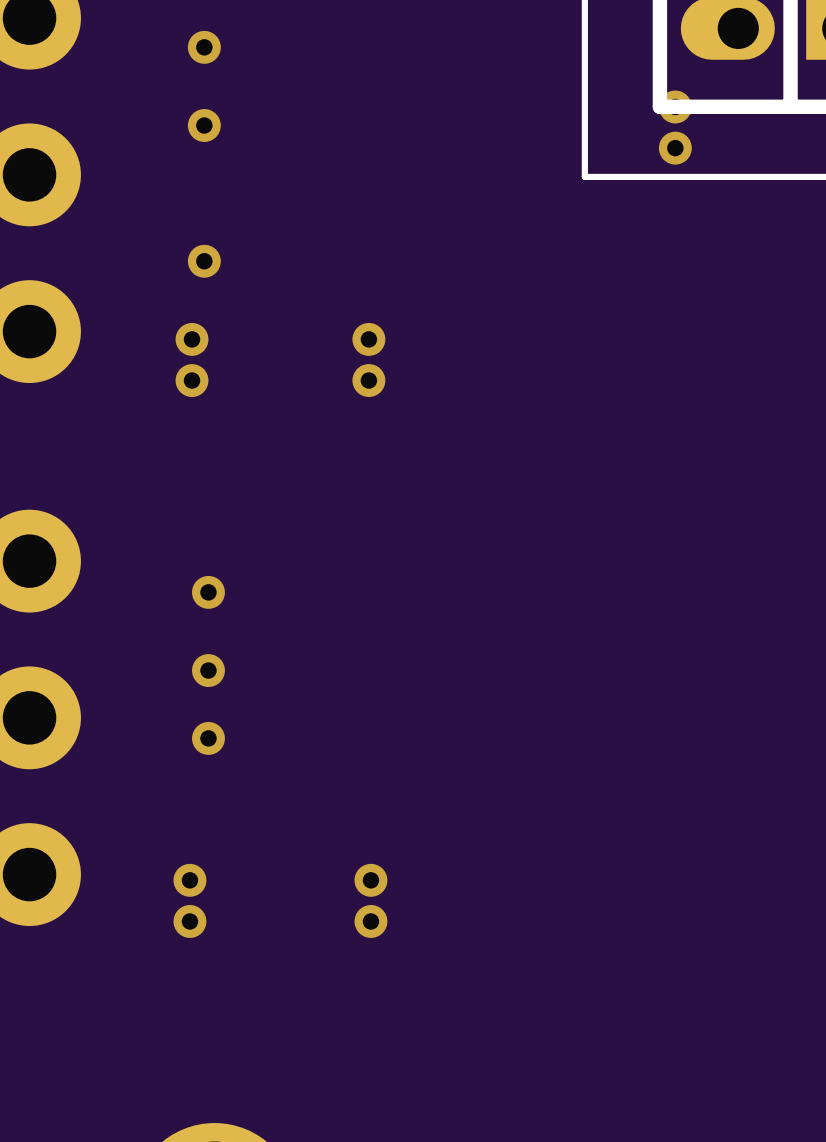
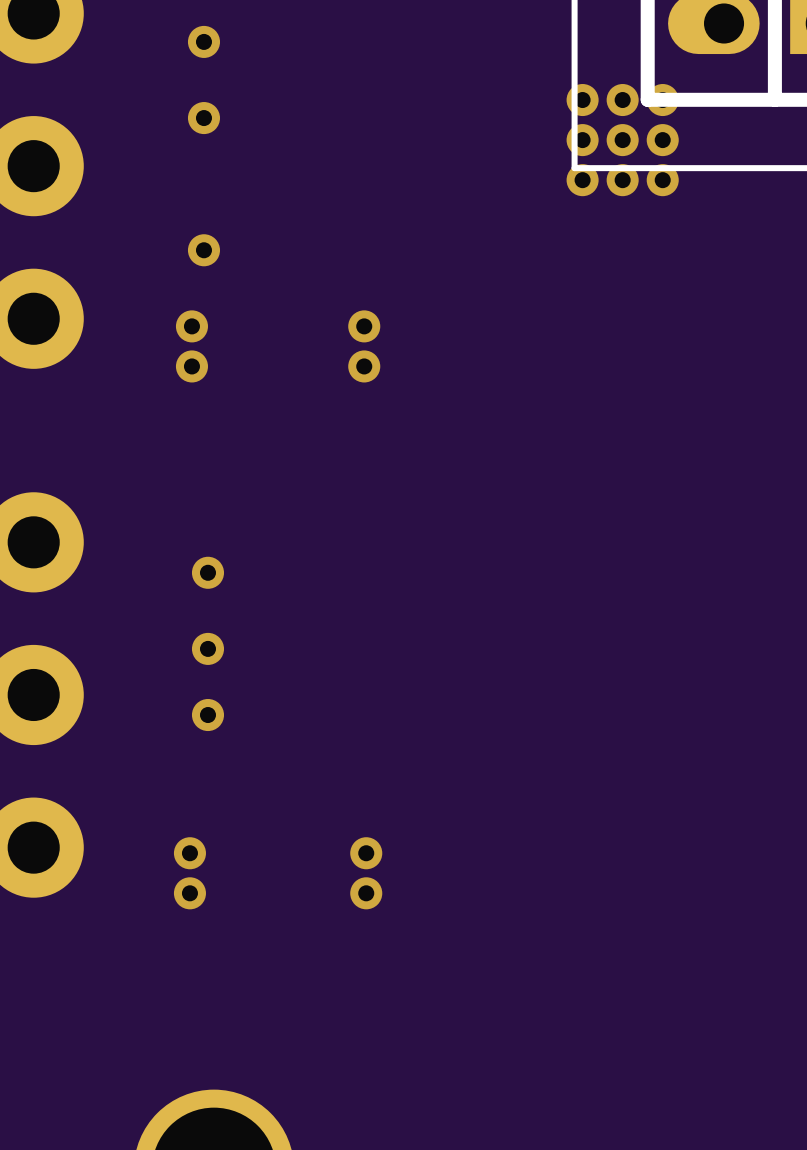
via: none -> (582, 100)
via: none -> (622, 100)
via: none -> (582, 140)
via: none -> (622, 140)
via: none -> (582, 180)
via: none -> (622, 180)
via: none -> (662, 180)

